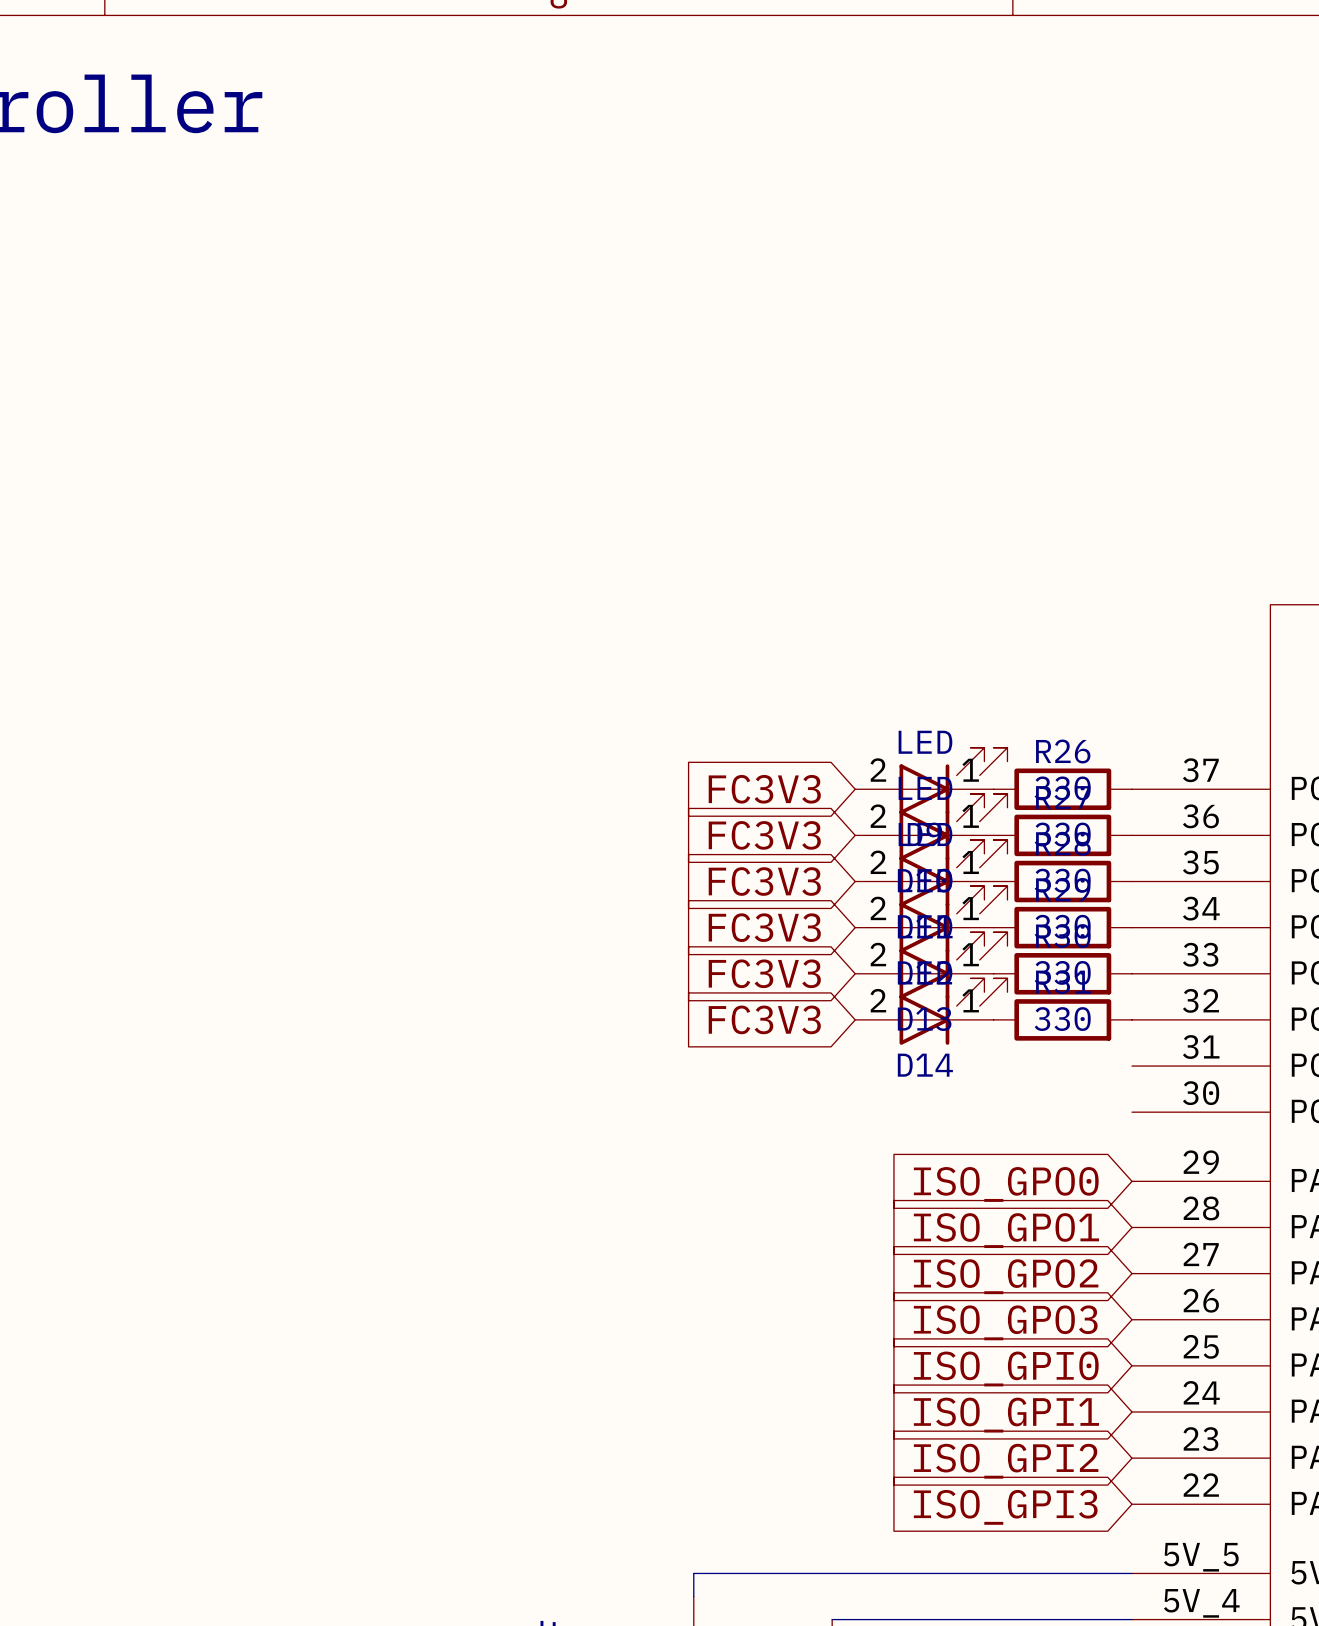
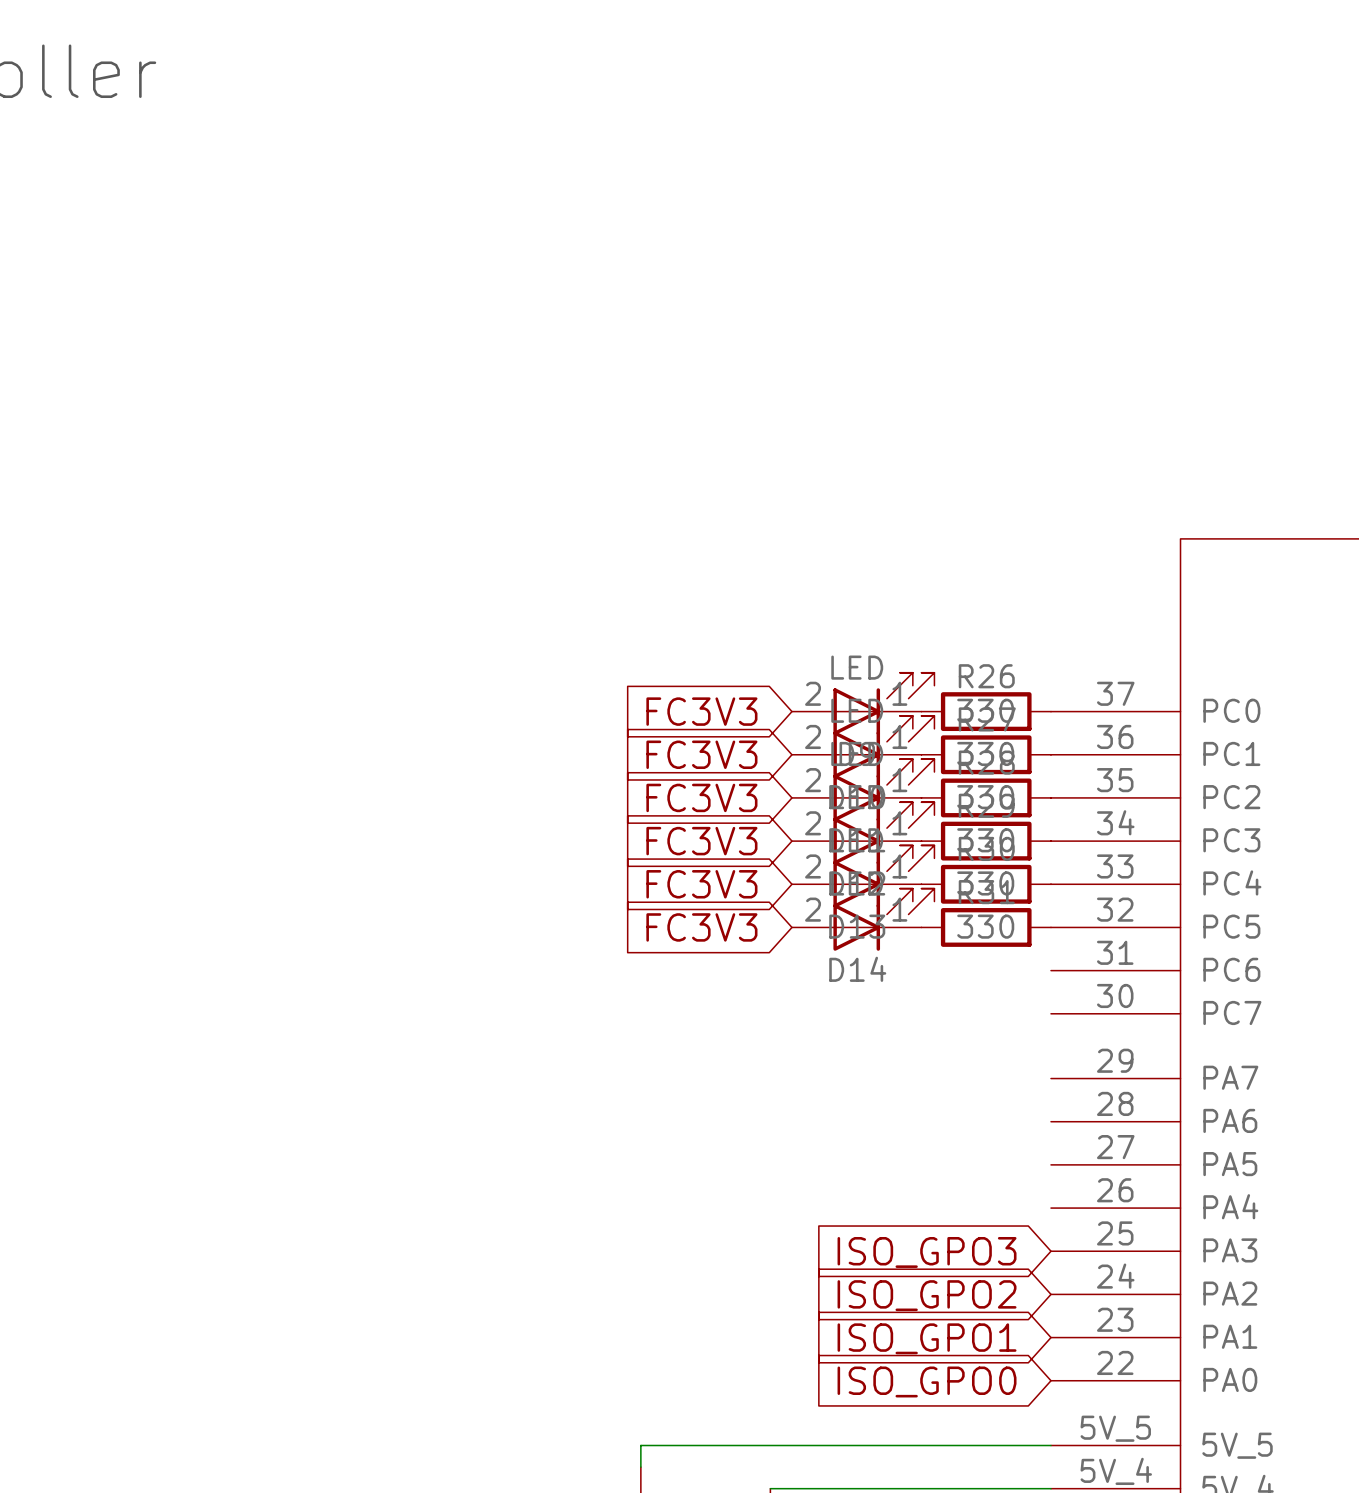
global label: ISO_GPO0 (1006, 1184) -> none
global label: ISO_GPO1 (1006, 1230) -> none
global label: ISO_GPO2 (1006, 1276) -> none
global label: ISO_GPO3 (1005, 1322) -> none
global label: ISO_GPI0 (1006, 1368) -> ISO_GPO3 (927, 1252)
global label: ISO_GPI1 (1006, 1415) -> ISO_GPO2 (927, 1295)
global label: ISO_GPI2 (1006, 1461) -> ISO_GPO1 (927, 1338)
global label: ISO_GPI3 (1005, 1507) -> ISO_GPO0 (927, 1381)

